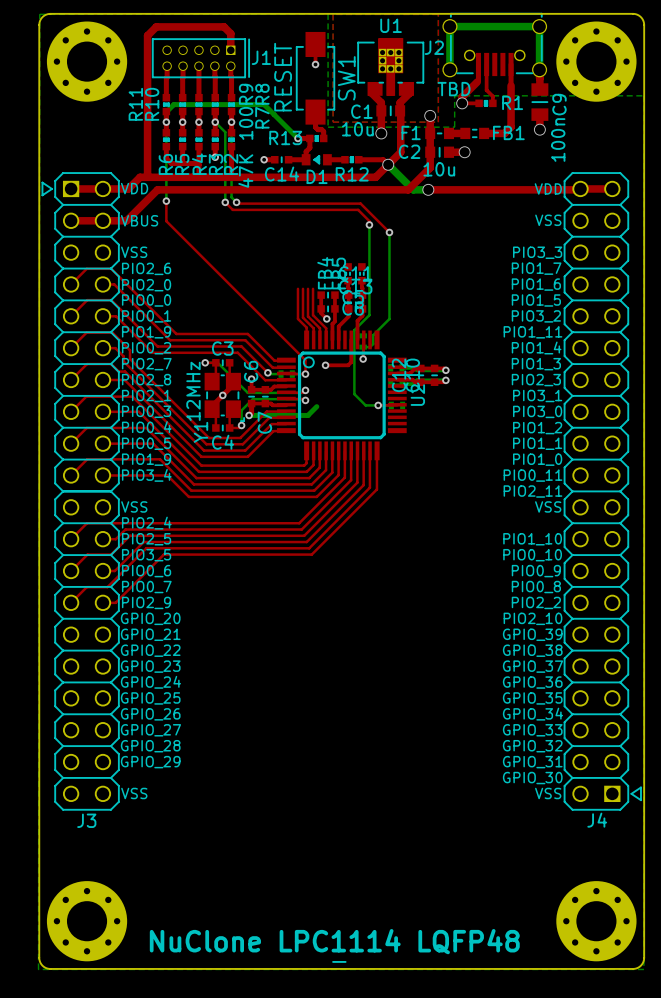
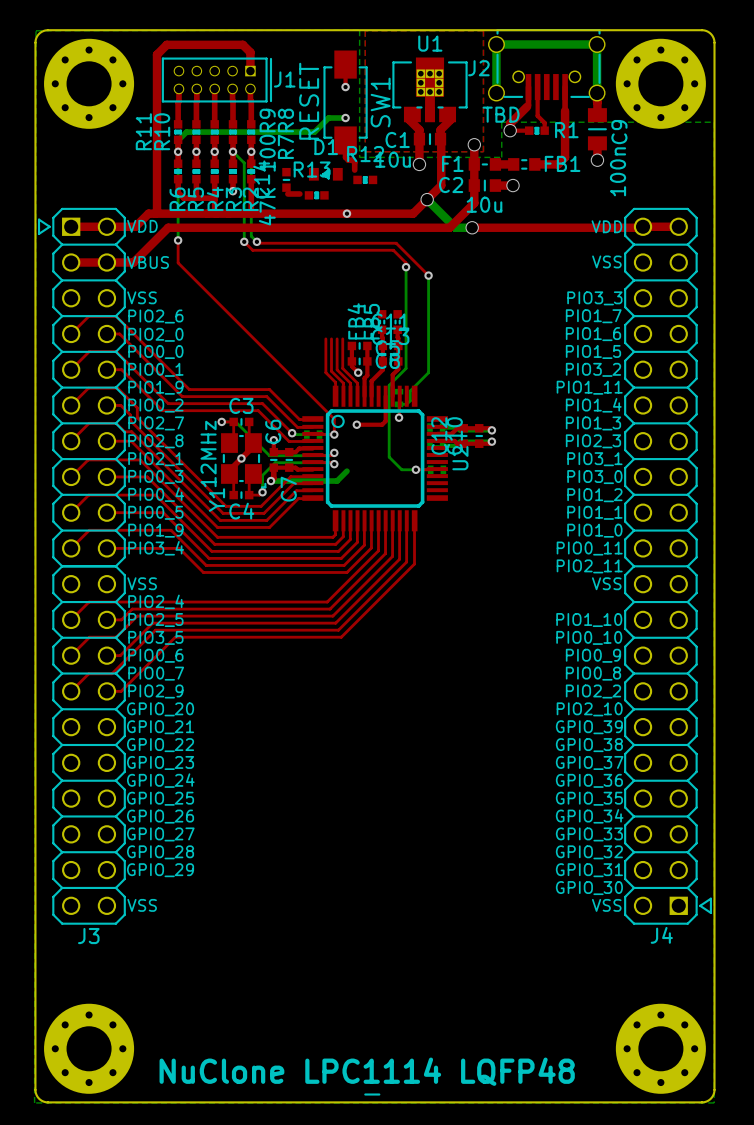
via: none -> (345, 118)
bottom track: (264, 104) (297, 138) -> (287, 132) (314, 132) (328, 118) (345, 118)
top track: (297, 138) (309, 138) (309, 147) (306, 151) (306, 159) (288, 159) -> none
via: (297, 138) -> none
R13 position: (316, 138) -> (316, 195)
via: (264, 159) -> none
C14 rotation: 0° (281, 159) -> 90° clockwise (286, 179)
C14 position: (281, 159) -> (286, 179)
D1 position: (316, 159) -> (325, 174)
top track: (327, 159) (344, 159) -> none
R12 position: (351, 159) -> (365, 179)
top track: (358, 159) (383, 159) (388, 164) -> none
R12 name position: R12 (352, 174) -> R12 (365, 154)
D1 name position: D1 (317, 176) -> D1 (326, 147)
via: none -> (346, 213)

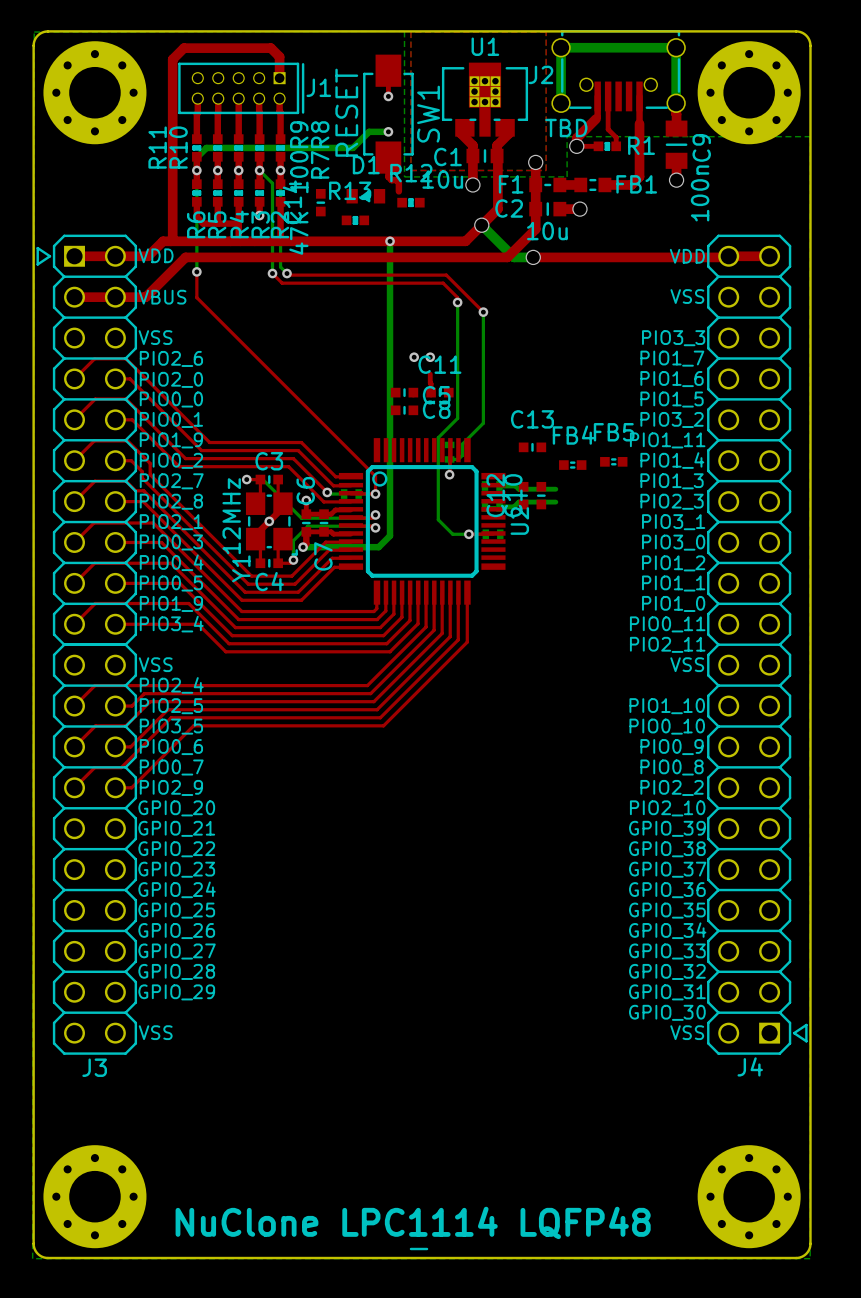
top track: (287, 193) (299, 193) -> none
bottom track: none -> (390, 241) (390, 535)
via: none -> (414, 357)
via: none -> (430, 357)
FB4 rotation: 0° (382, 322) -> 90° clockwise (572, 465)
FB4 position: (382, 322) -> (572, 465)
FB5 rotation: 0° (397, 322) -> 90° clockwise (613, 461)
FB5 position: (397, 322) -> (613, 461)
top track: (397, 329) (398, 369) (392, 374) (392, 396) -> none
top track: (325, 338) (325, 372) (335, 382) (335, 396) -> none
top track: (331, 338) (331, 371) (343, 383) (343, 396) -> none
top track: (337, 338) (337, 369) (350, 383) (350, 396) -> none
top track: (342, 338) (342, 368) (357, 383) (357, 396) -> none
top track: (351, 345) (351, 366) (358, 372) -> none
top track: (367, 348) (367, 375) (364, 378) (364, 396) -> none
top track: (382, 348) (382, 369) (371, 381) (371, 396) -> none
C13 position: (390, 361) -> (532, 447)
via: (358, 372) -> none
top track: (385, 396) (385, 421) (382, 424) (356, 424) -> none
via: (356, 424) -> none
top track: (491, 430) (489, 428) (457, 428) (451, 433) (437, 433) -> none
via: (491, 430) -> none
top track: (437, 440) (454, 440) (457, 443) (489, 443) (491, 441) -> none
via: (491, 441) -> none

